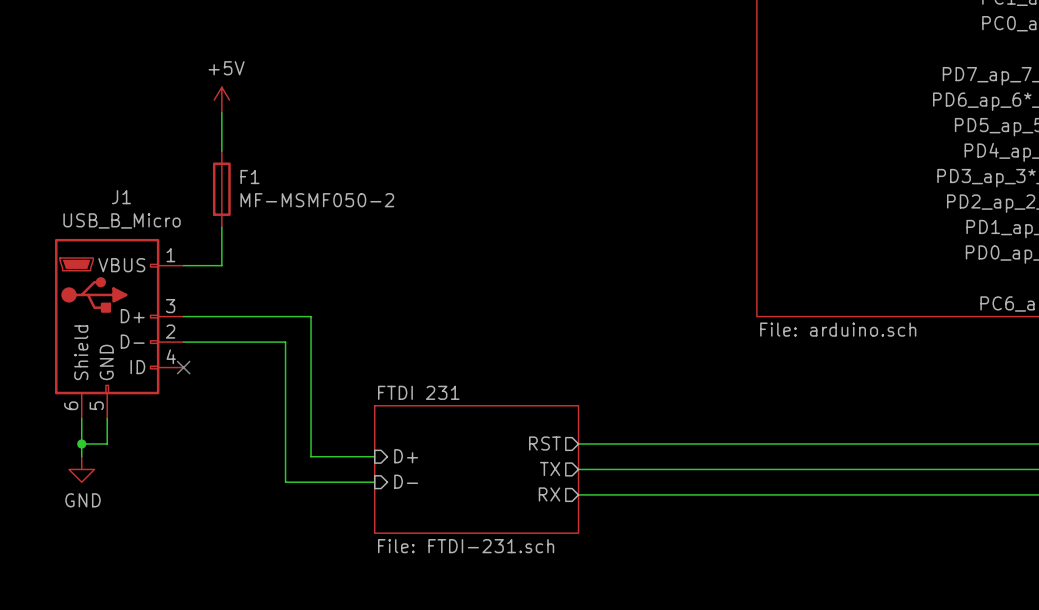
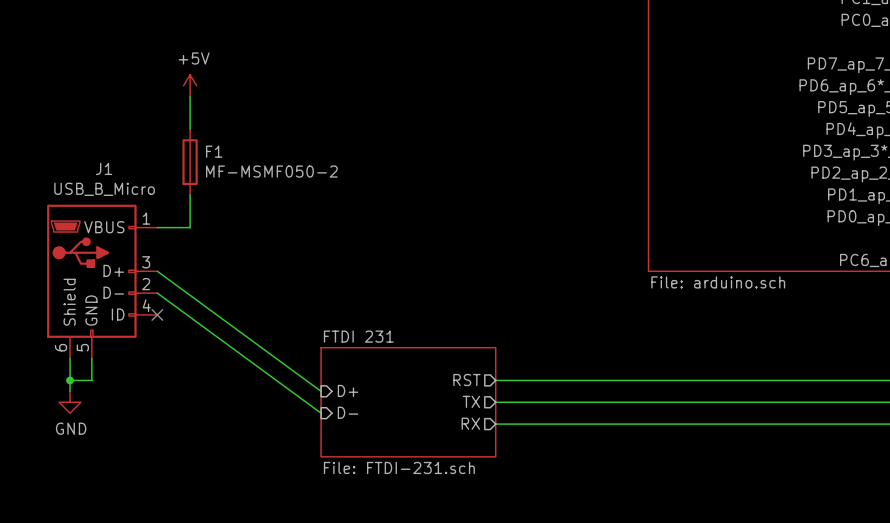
wire: (183, 316) (311, 316) (311, 456) (374, 456) -> (157, 271) (321, 391)
wire: (183, 342) (285, 342) (285, 482) (374, 482) -> (157, 293) (321, 413)

